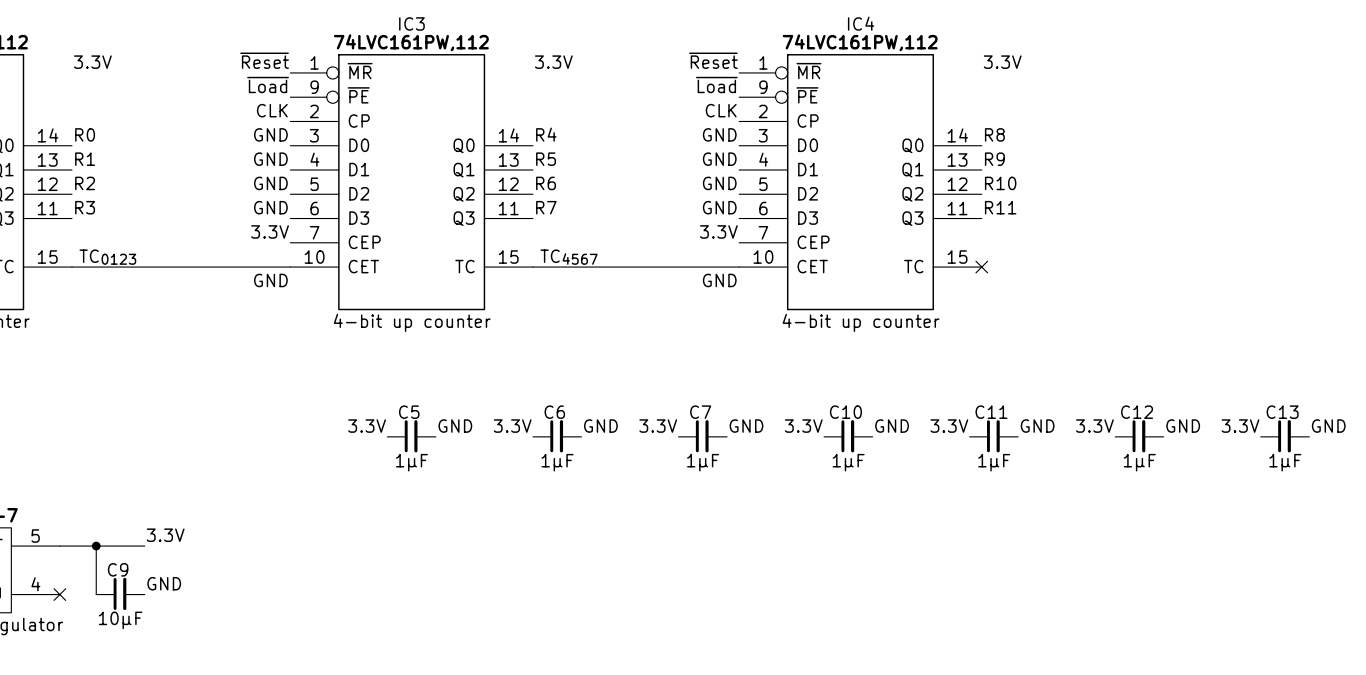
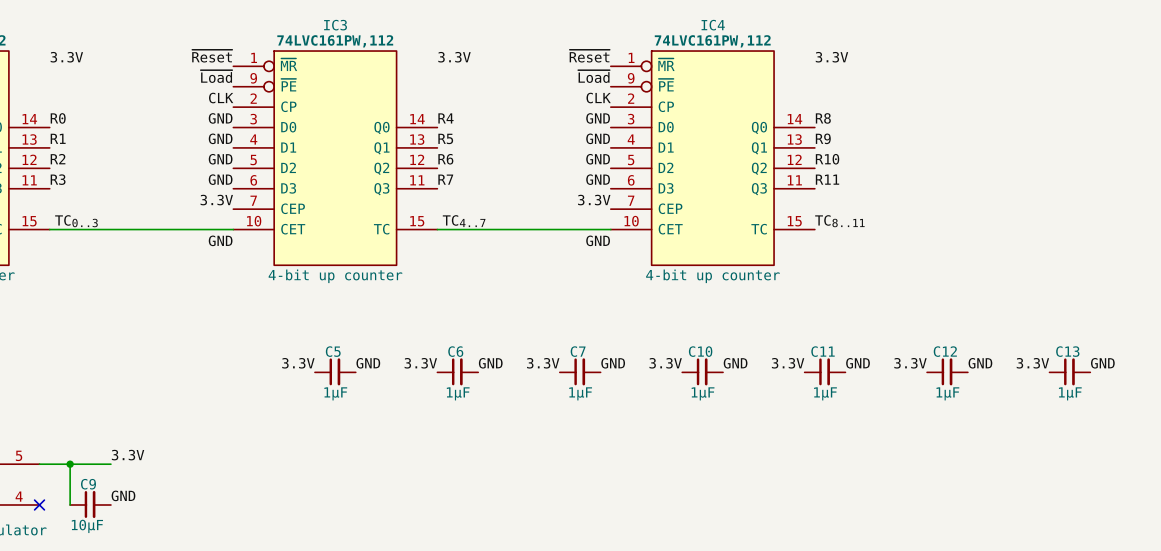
label: TC0123 (107, 257) -> TC0..3 (76, 221)
label: TC4567 (569, 257) -> TC4..7 (464, 221)
label: none -> TC8..11 (839, 221)
no-connect mark: (981, 267) -> none

